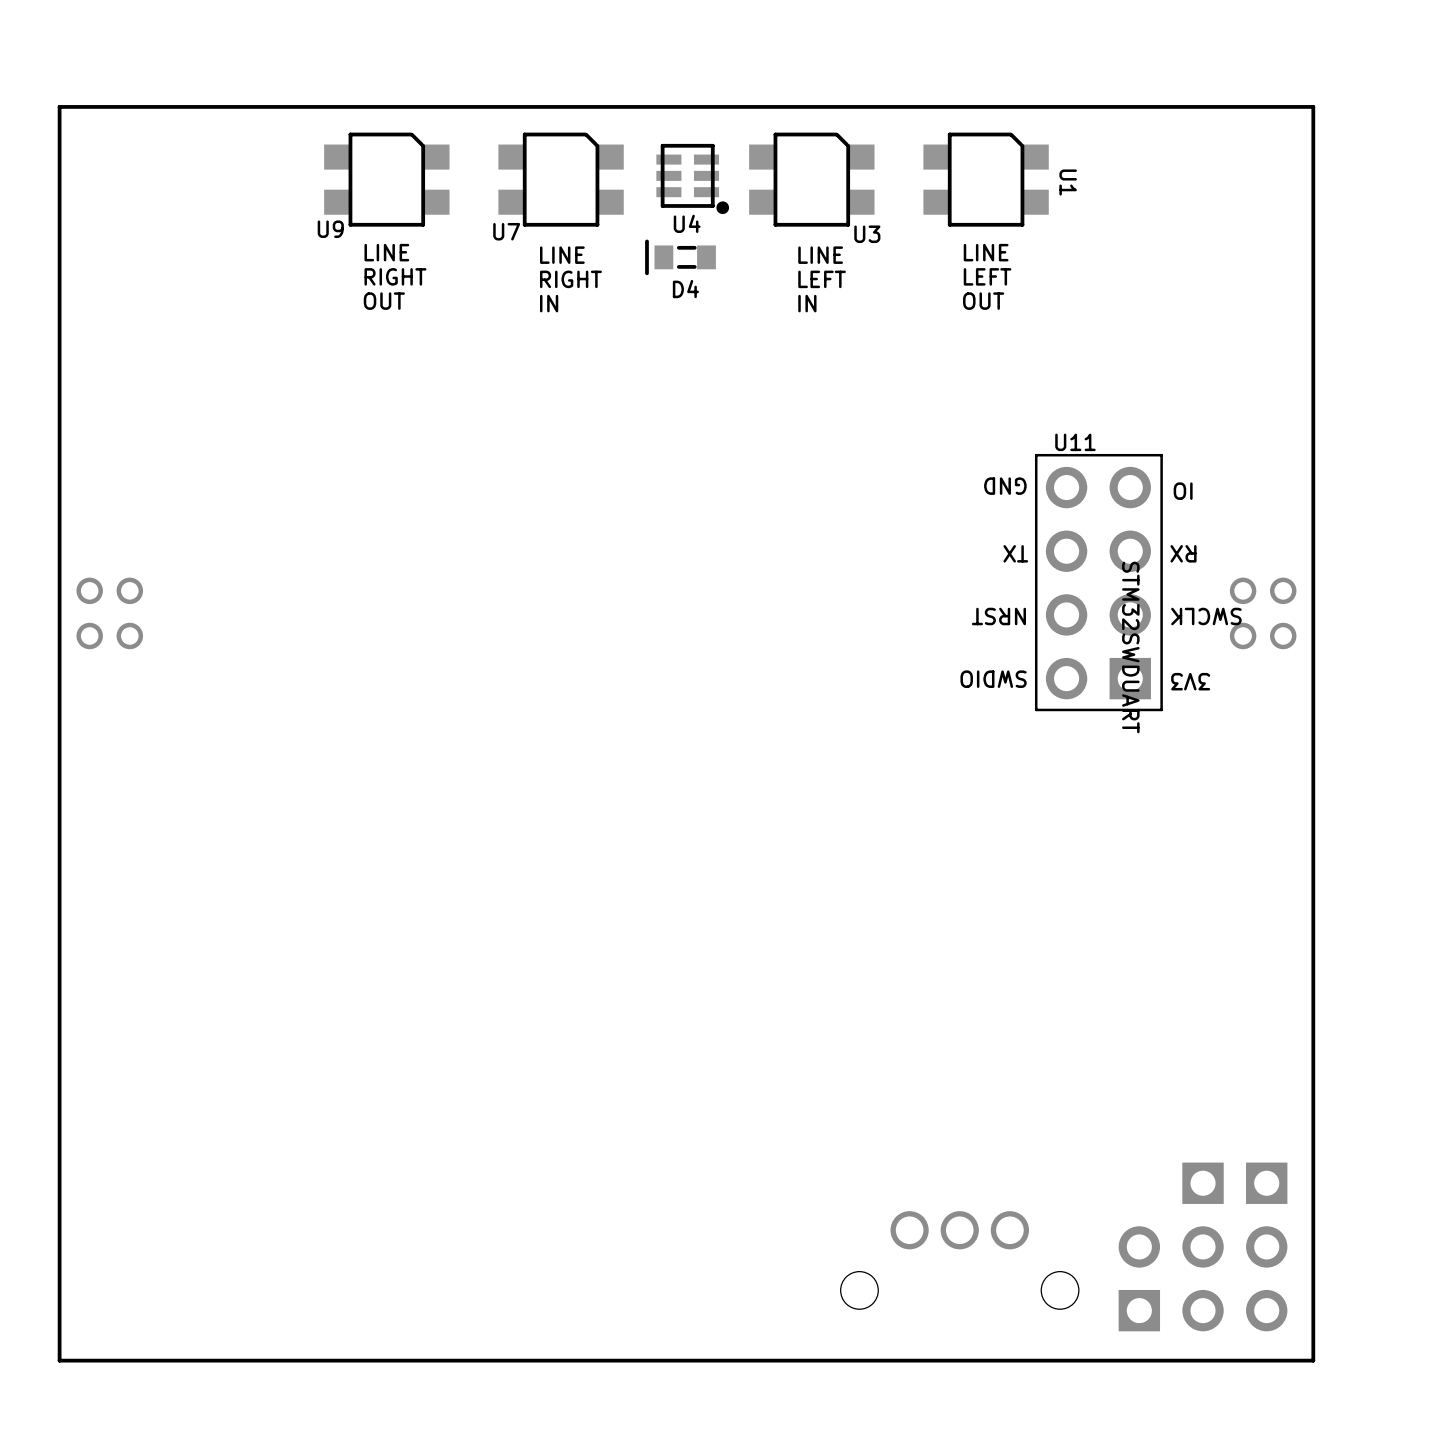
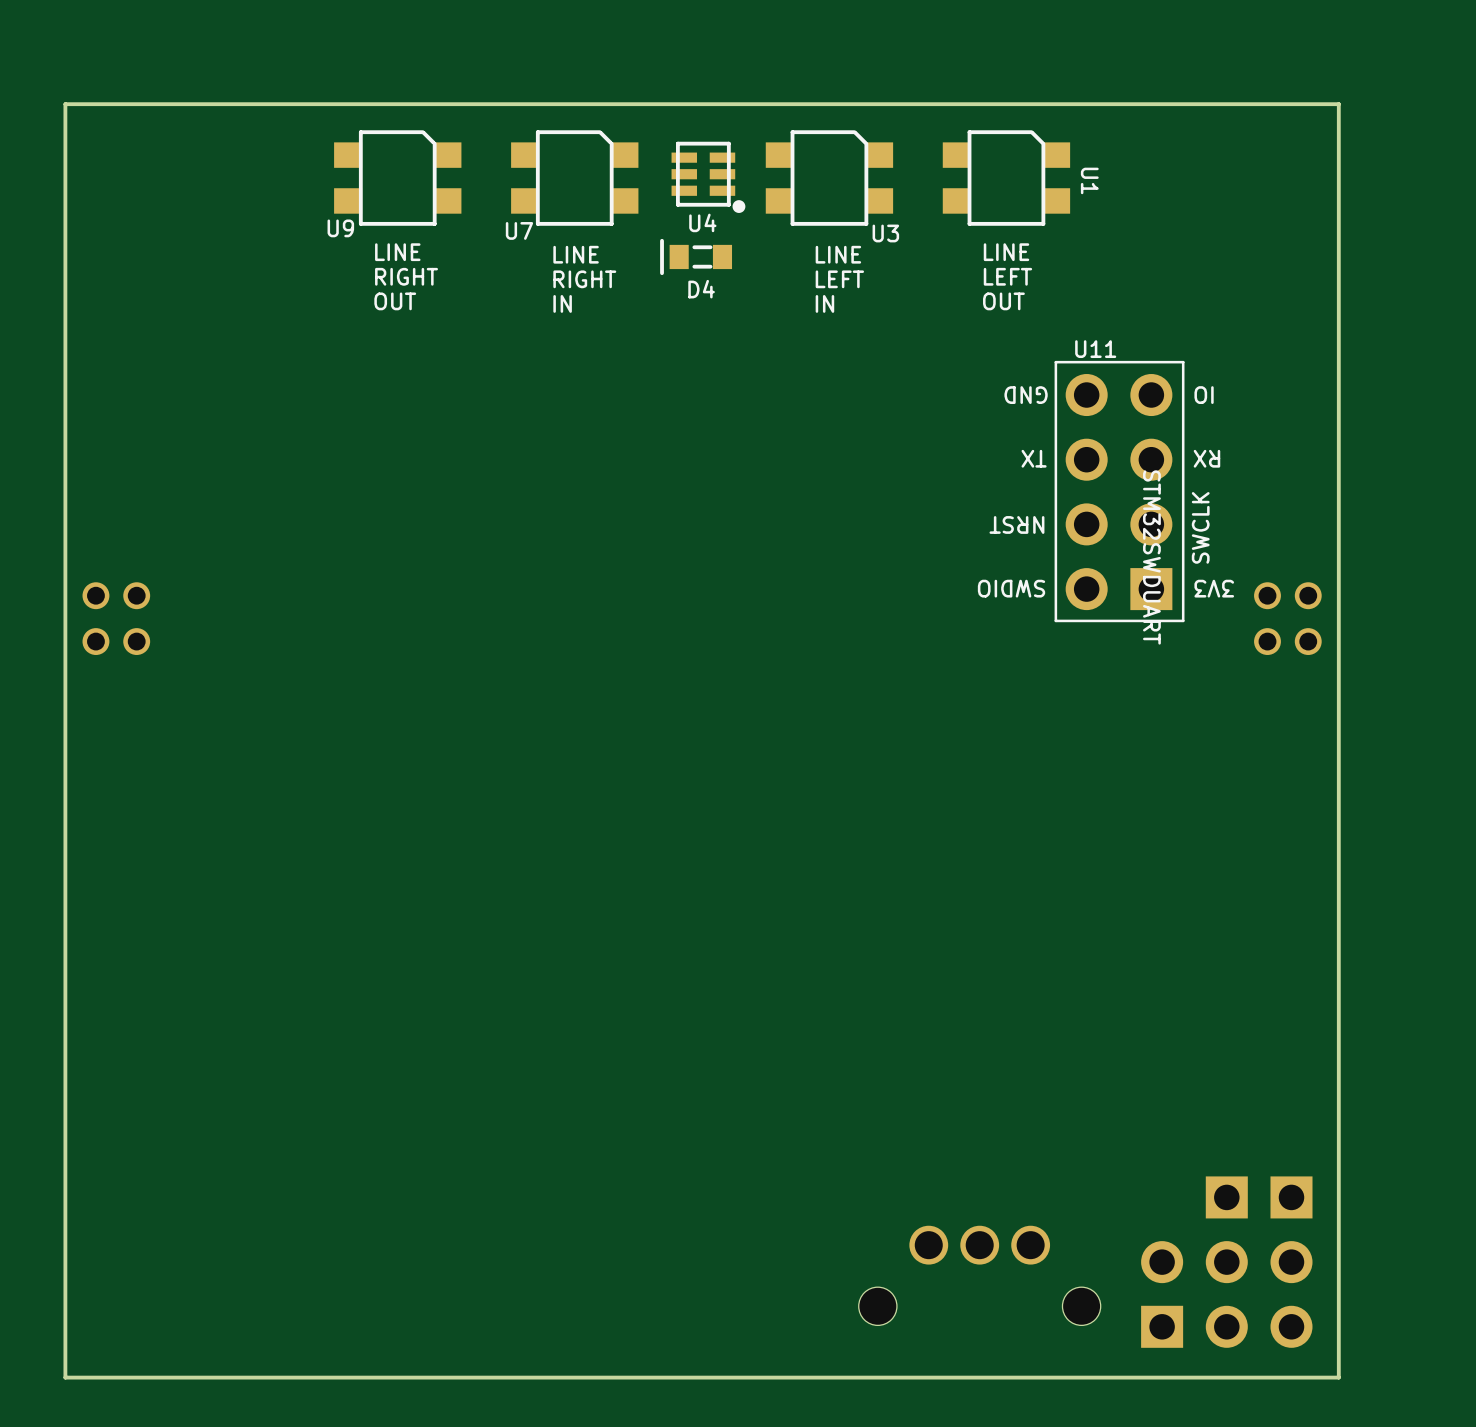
text: none -> IO (1204, 395)
text position: GND (1005, 486) -> GND (1026, 395)
text: IO (1183, 491) -> SWCLK (1200, 527)
text position: TX (1015, 553) -> TX (1034, 458)
text position: RX (1183, 553) -> RX (1206, 458)
U11 position: (1098, 582) -> (1119, 491)
text position: NRST (998, 616) -> NRST (1016, 524)
text: SWCLK (1206, 616) -> none
text position: SWDIO (993, 679) -> SWDIO (1011, 588)
text position: 3V3 (1190, 681) -> 3V3 (1214, 588)

